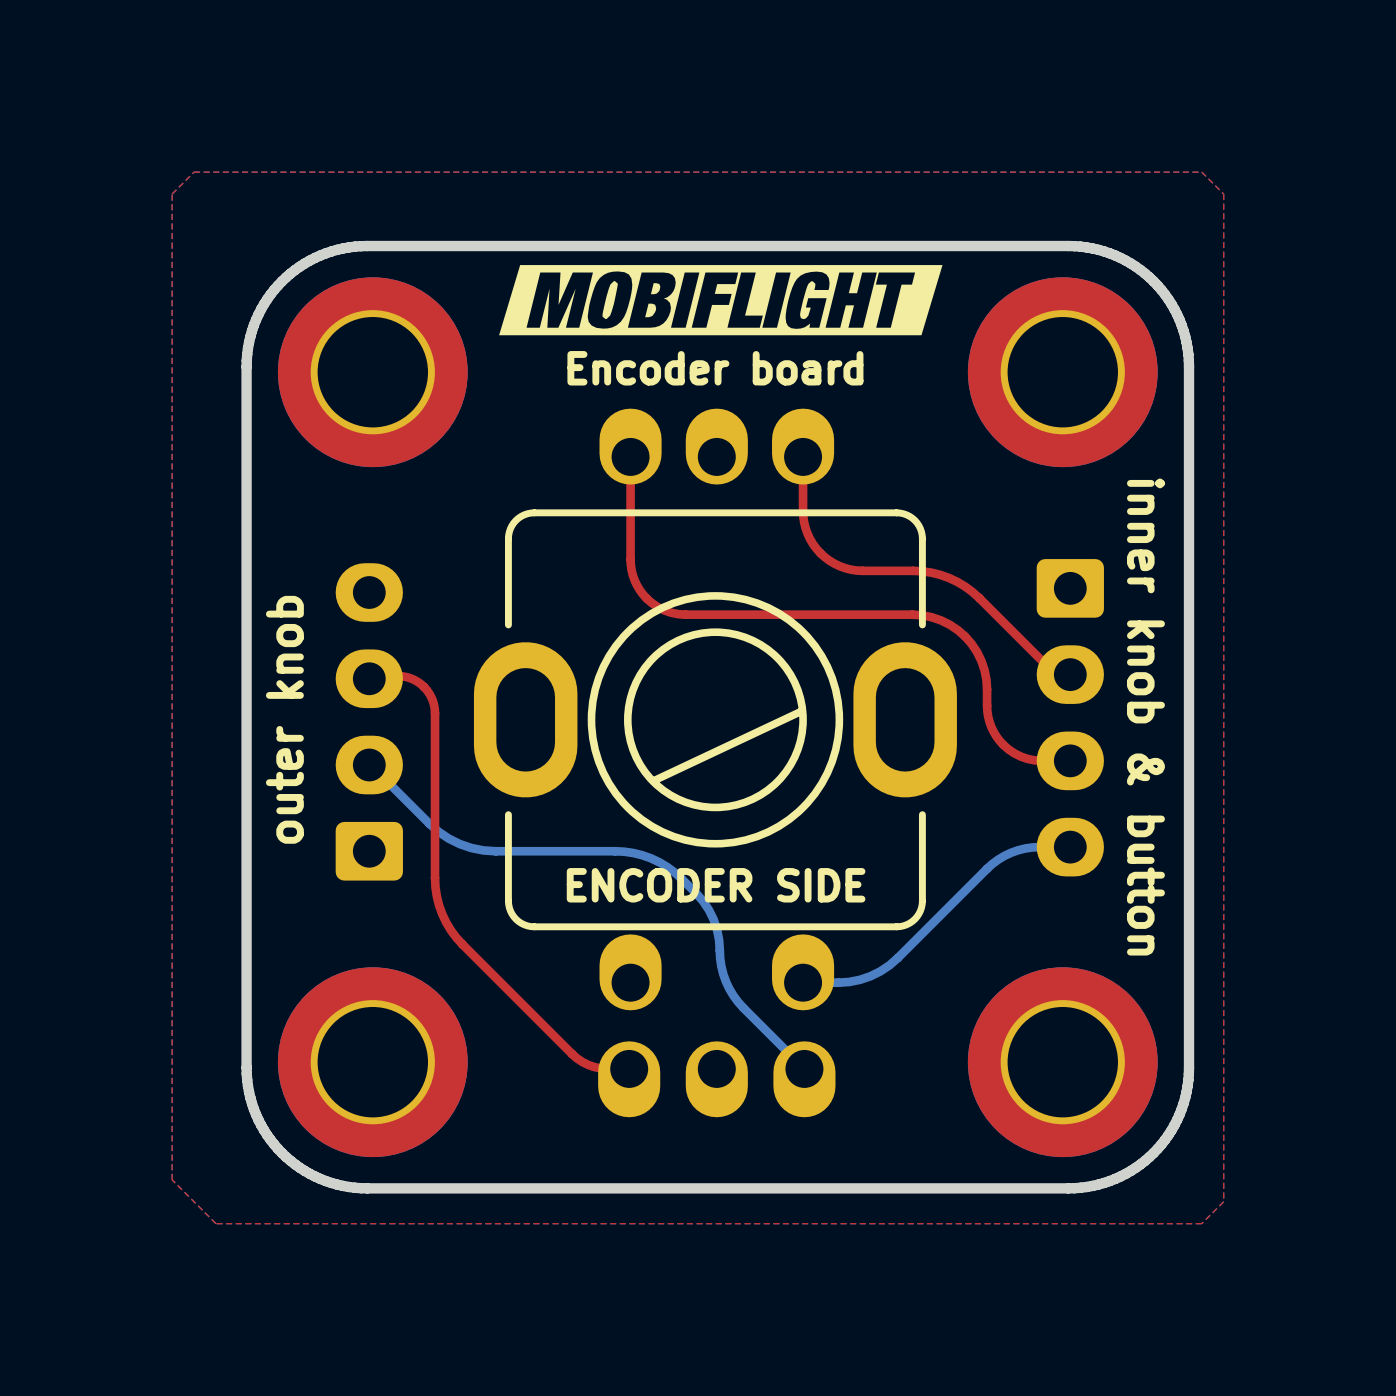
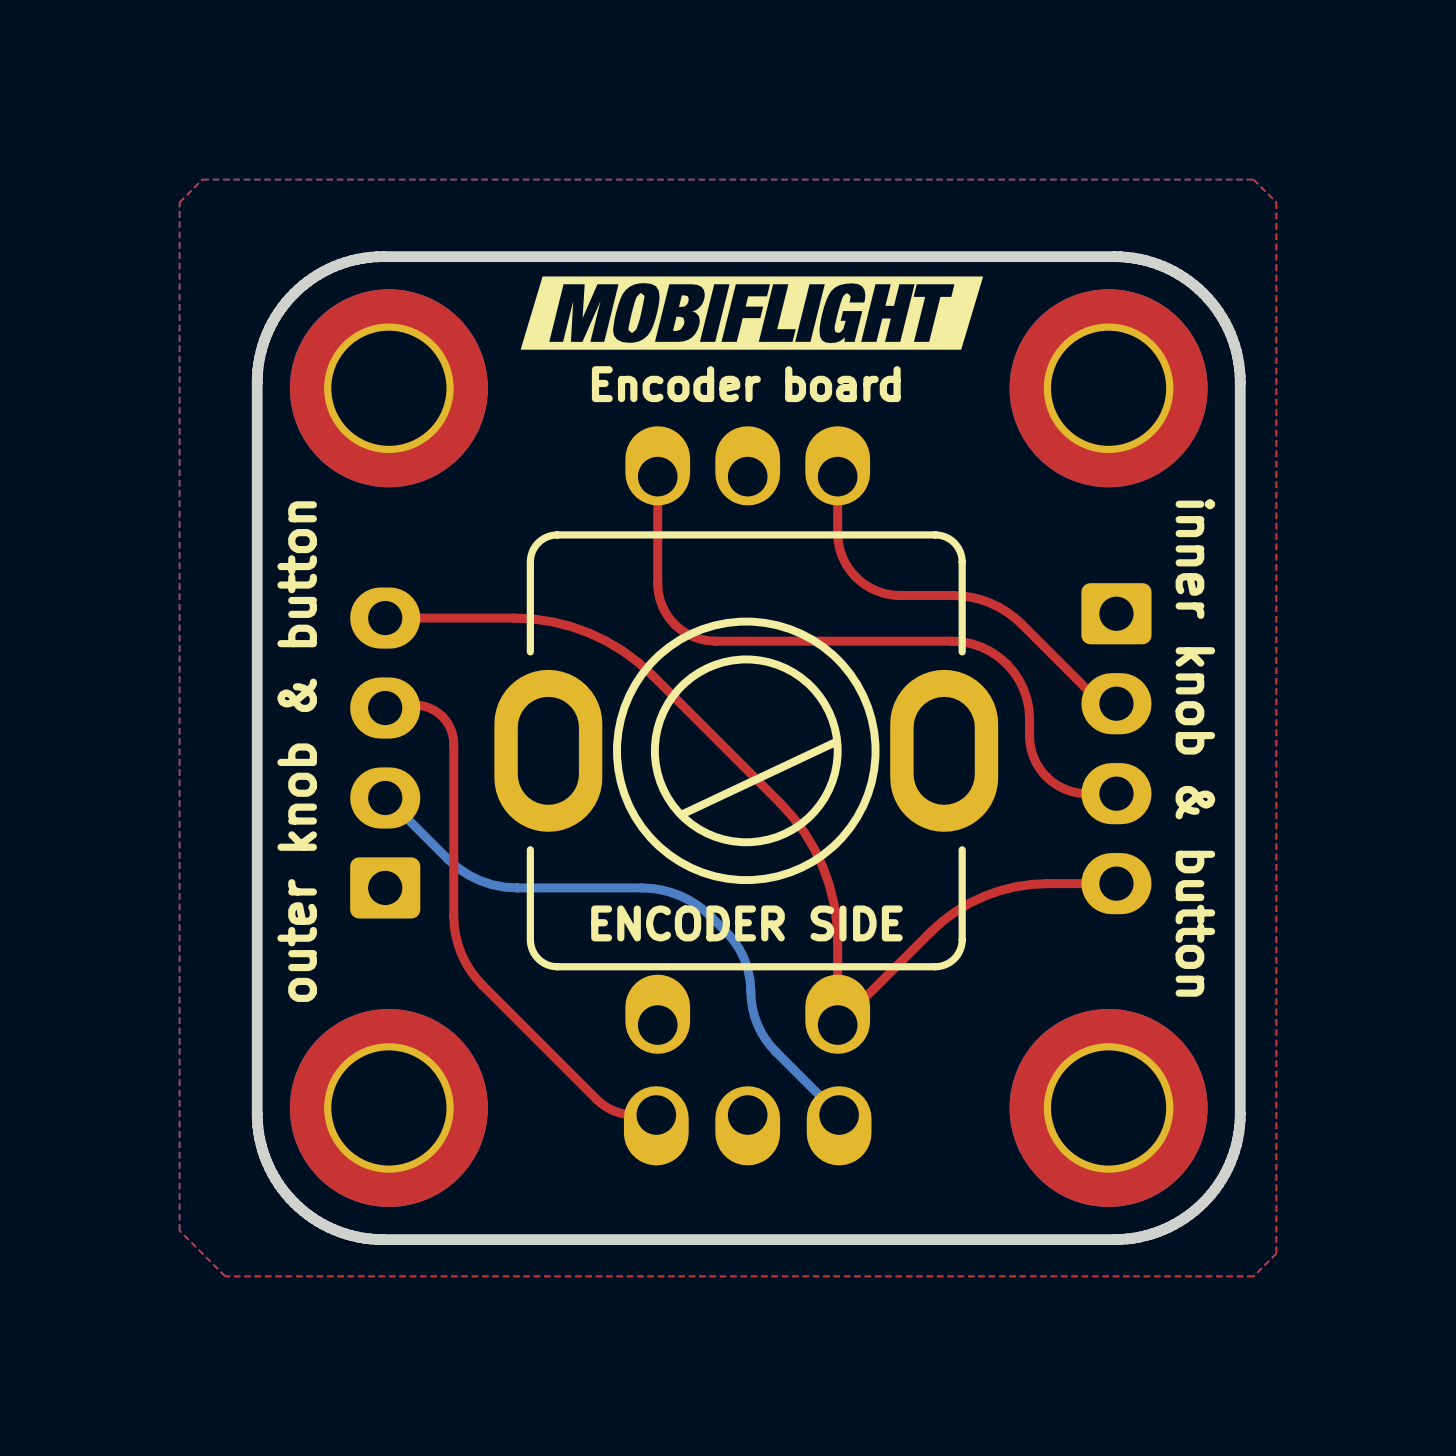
top track: none -> (385, 618) (514, 618) (552, 621) (589, 632) (622, 651) (638, 662) (780, 803) (804, 832) (814, 849) (829, 884) (836, 922) (837, 1025) (930, 932) (942, 921) (969, 903) (999, 890) (1031, 884) (1116, 883)
text: outer knob (284, 719) -> outer knob & button (297, 751)
bottom track: (1070, 847) (1025, 848) (998, 859) (897, 957) (880, 971) (849, 981) (803, 982) -> none

